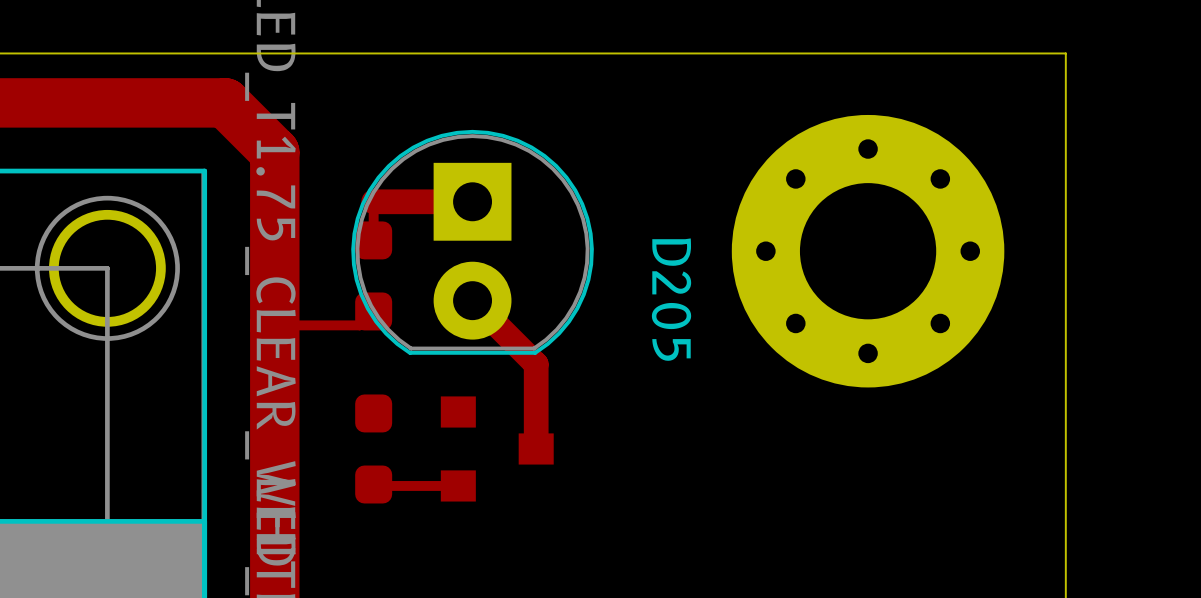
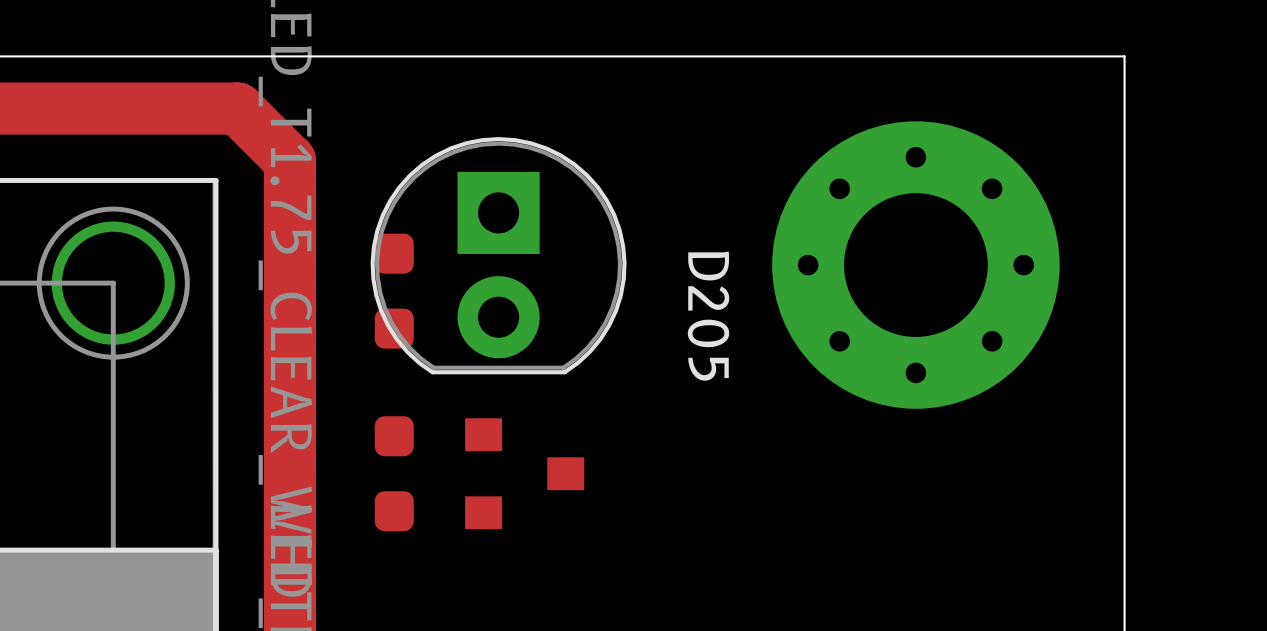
top track: (472, 201) (373, 201) (373, 240) -> none
top track: (472, 300) (536, 364) (536, 448) -> none
top track: (373, 311) (359, 325) (274, 325) -> none
top track: (373, 484) (458, 485) -> none

